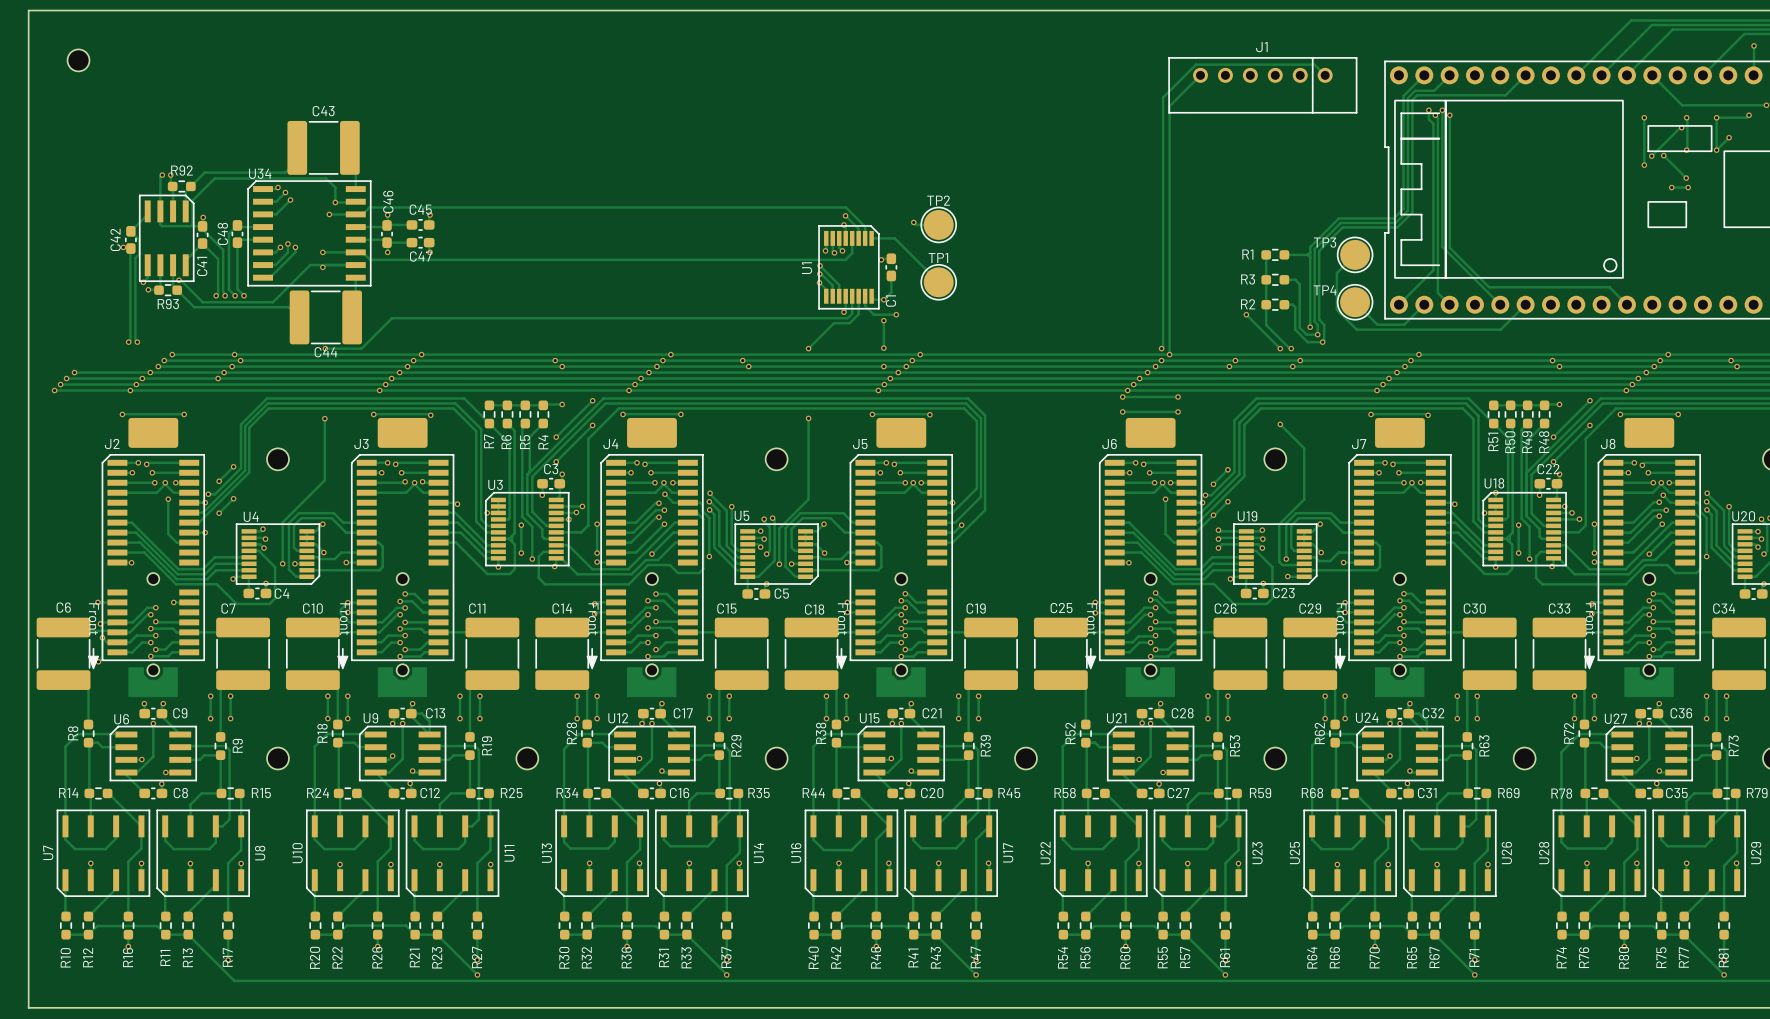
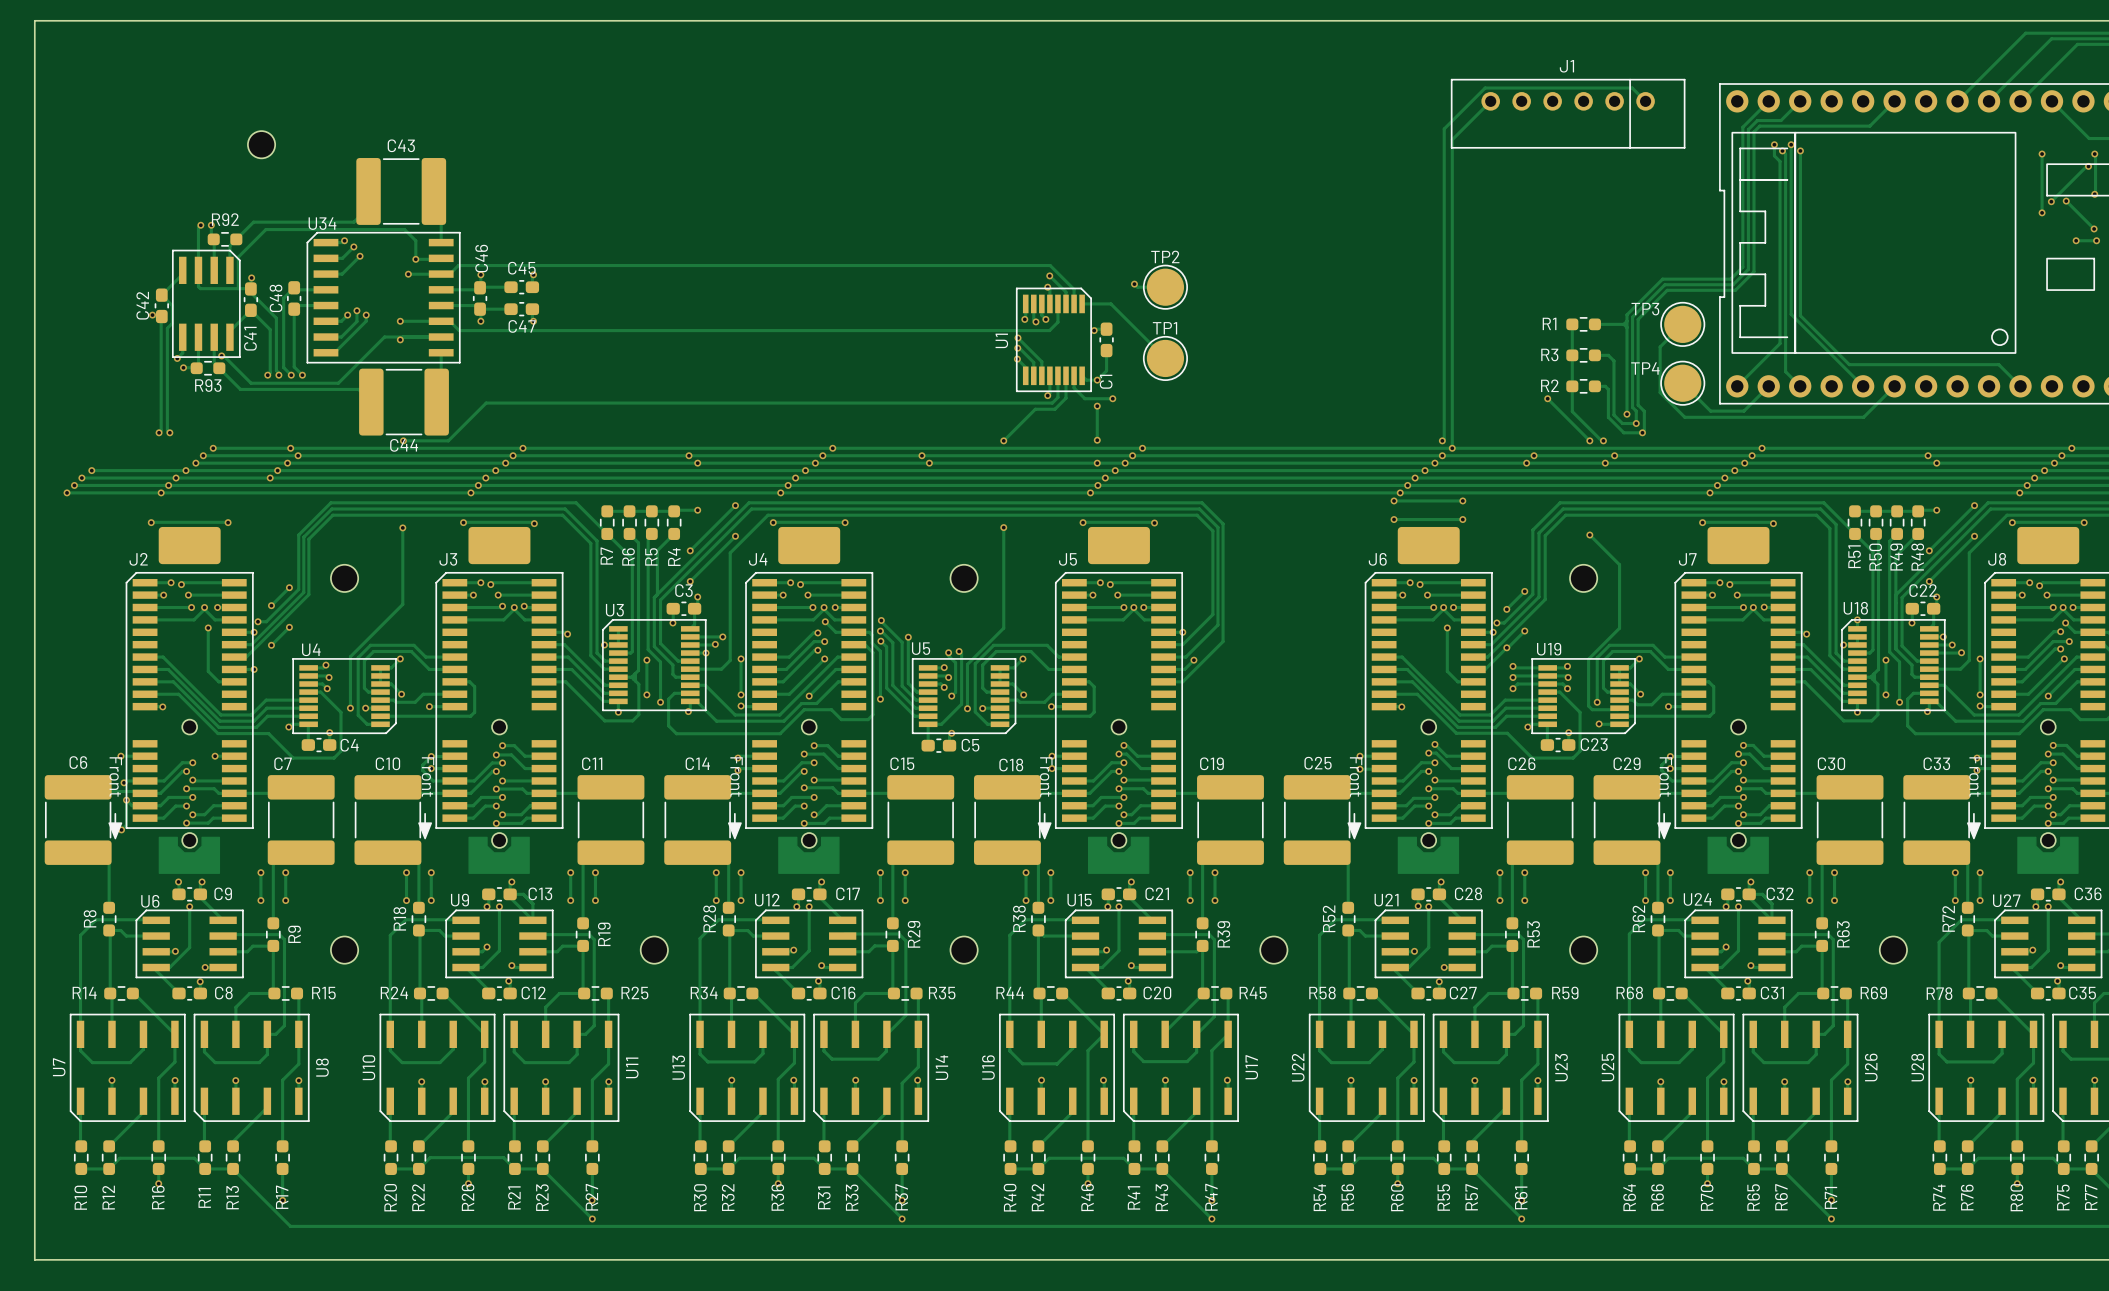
part position: (78, 60) -> (261, 144)

